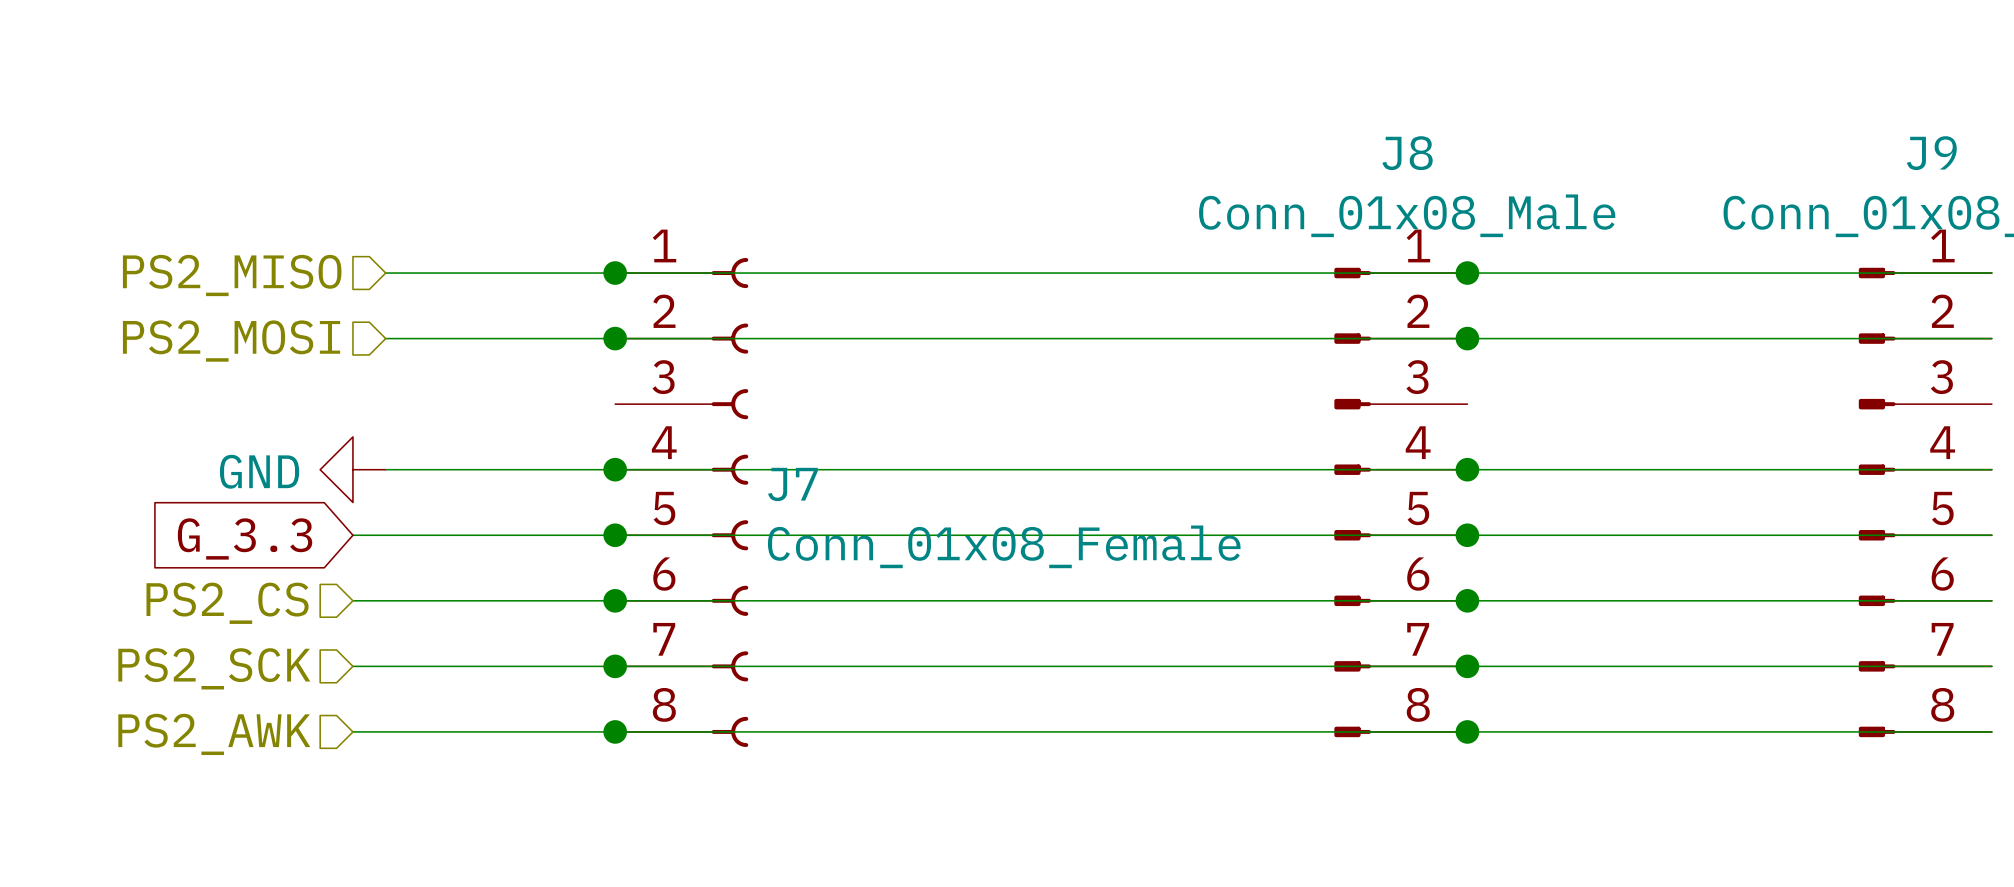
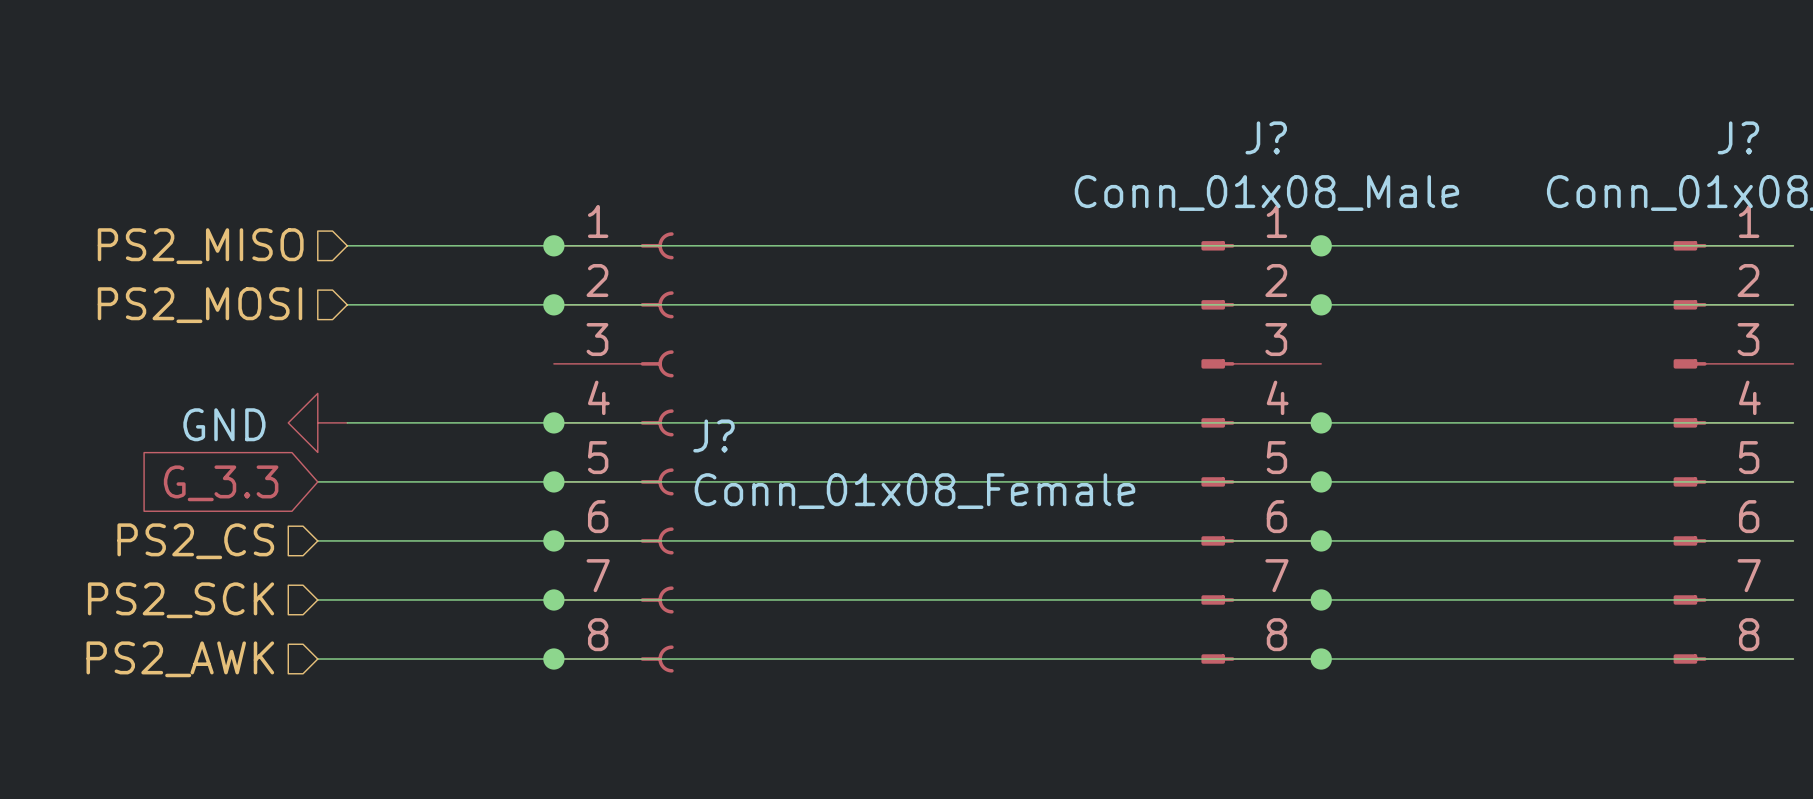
J8 name: J8 (1407, 153) -> J? (1266, 137)
J9 name: J9 (1931, 153) -> J? (1738, 137)
J7 name: J7 (792, 484) -> J? (713, 435)

